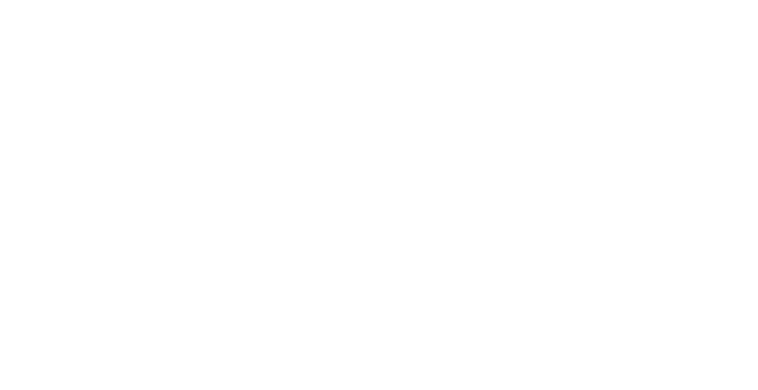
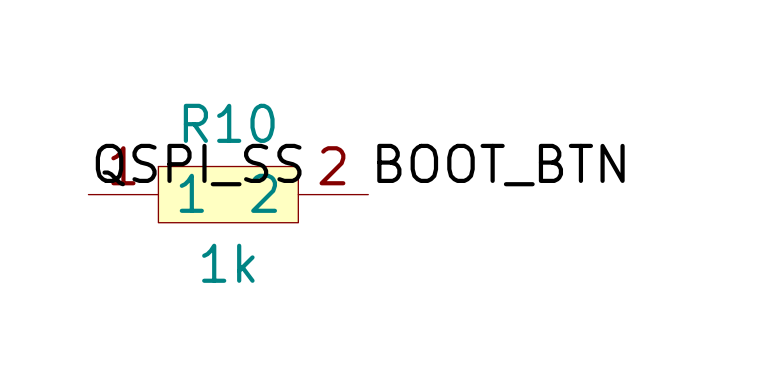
label: none -> QSPI_SS (198, 165)
label: none -> BOOT_BTN (500, 165)
R10: none -> 1k (228, 194)

